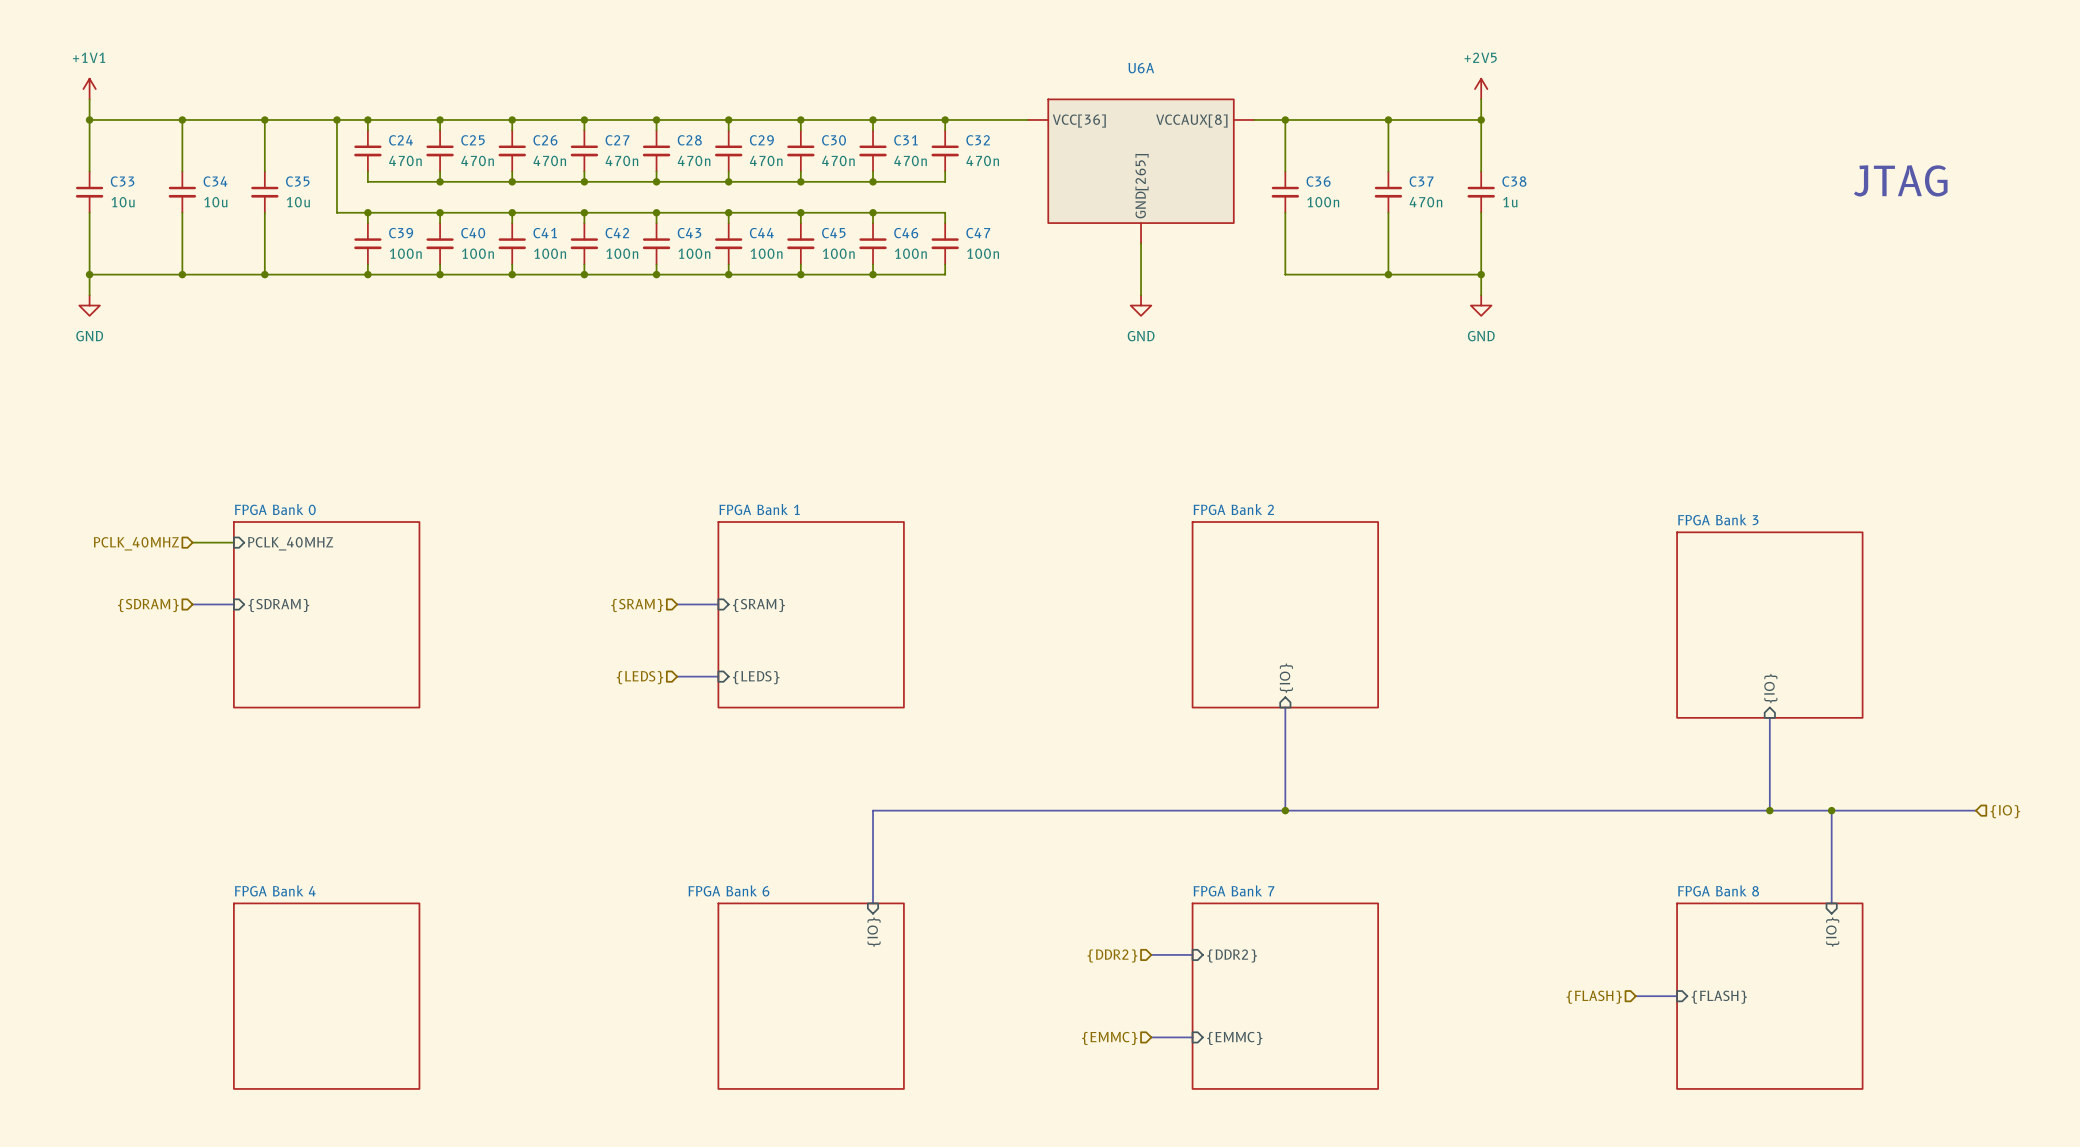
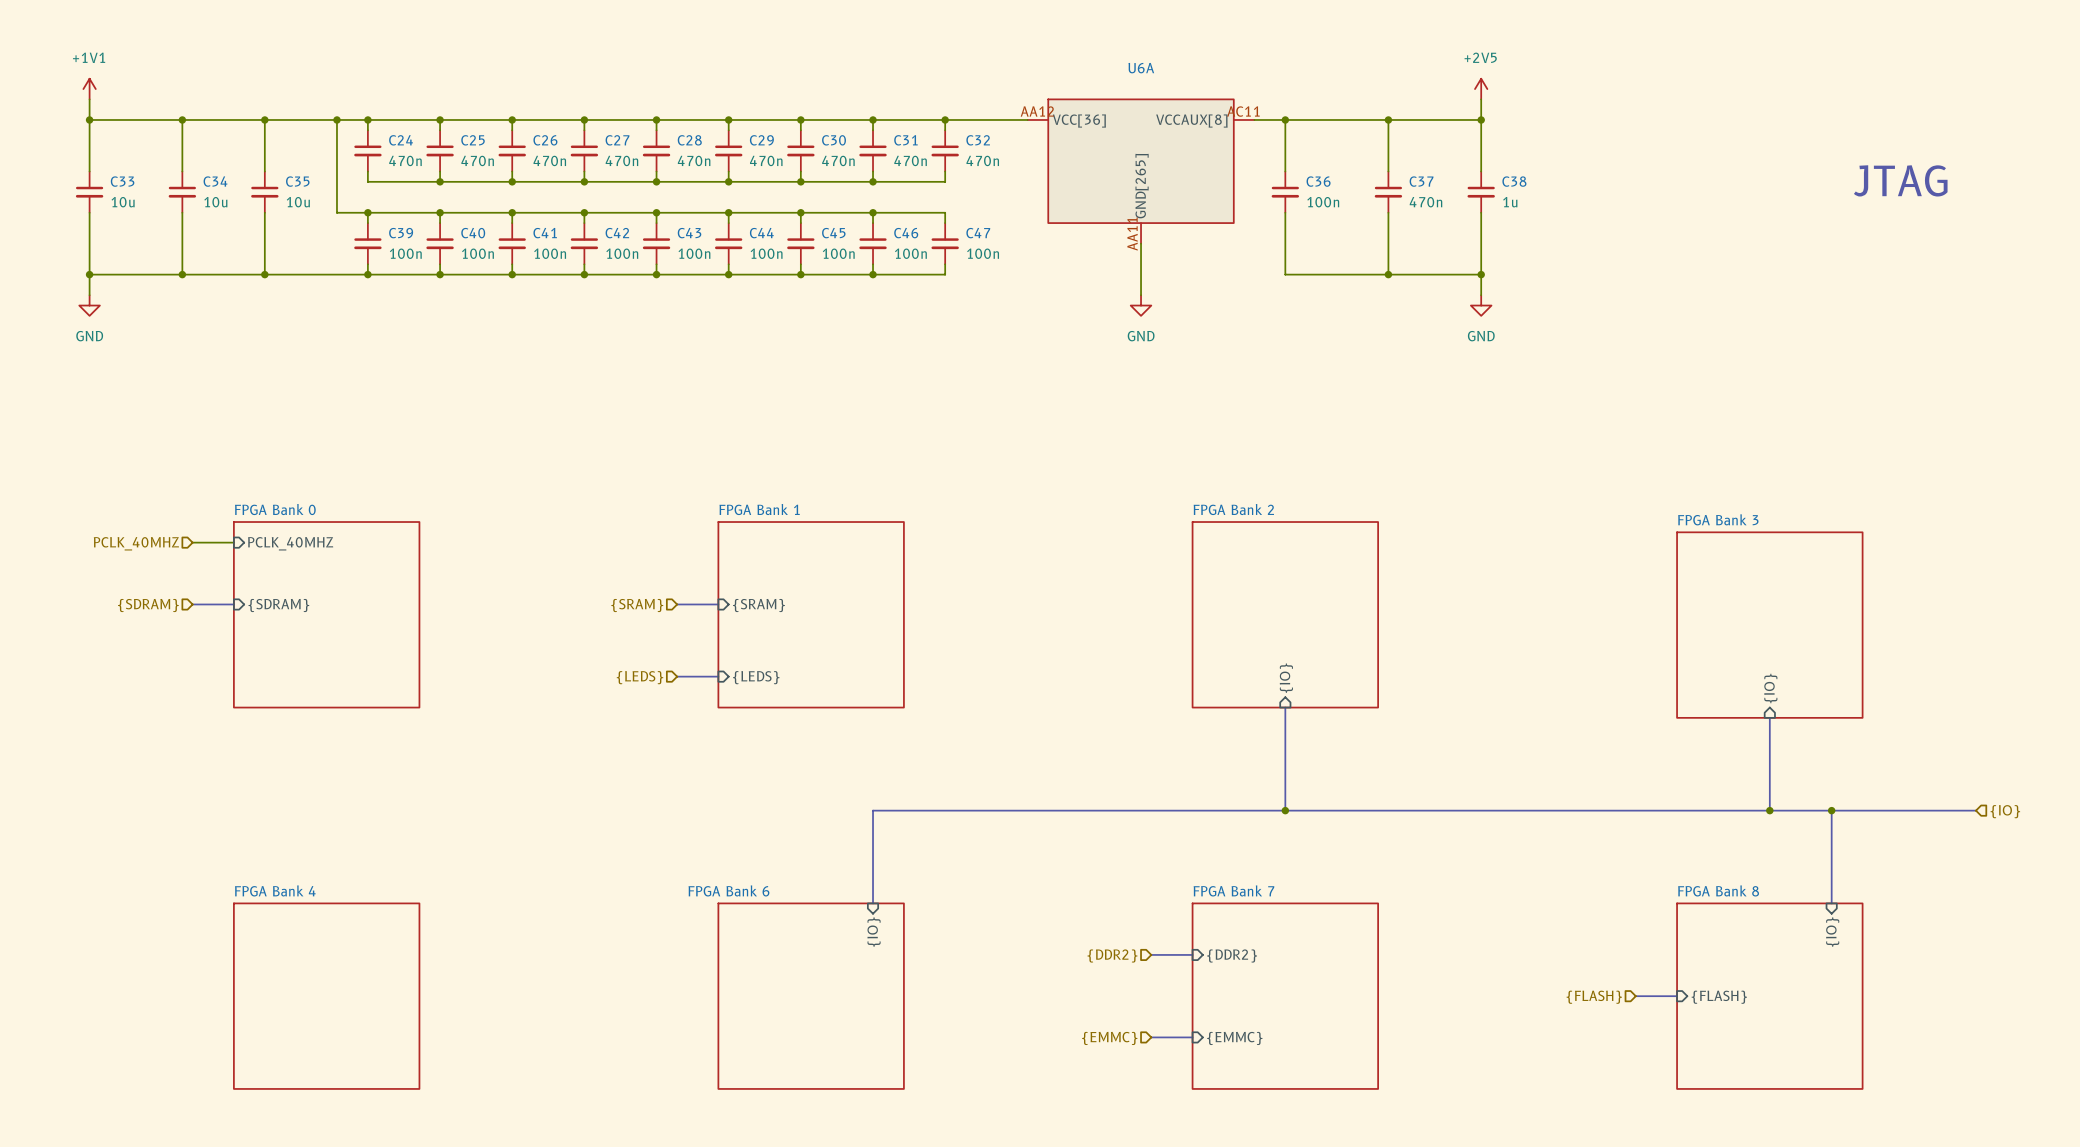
U6A pin number: none -> AA12 (1037, 111)
U6A pin number: none -> AC11 (1243, 111)
U6A pin number: none -> AA11 (1132, 234)

